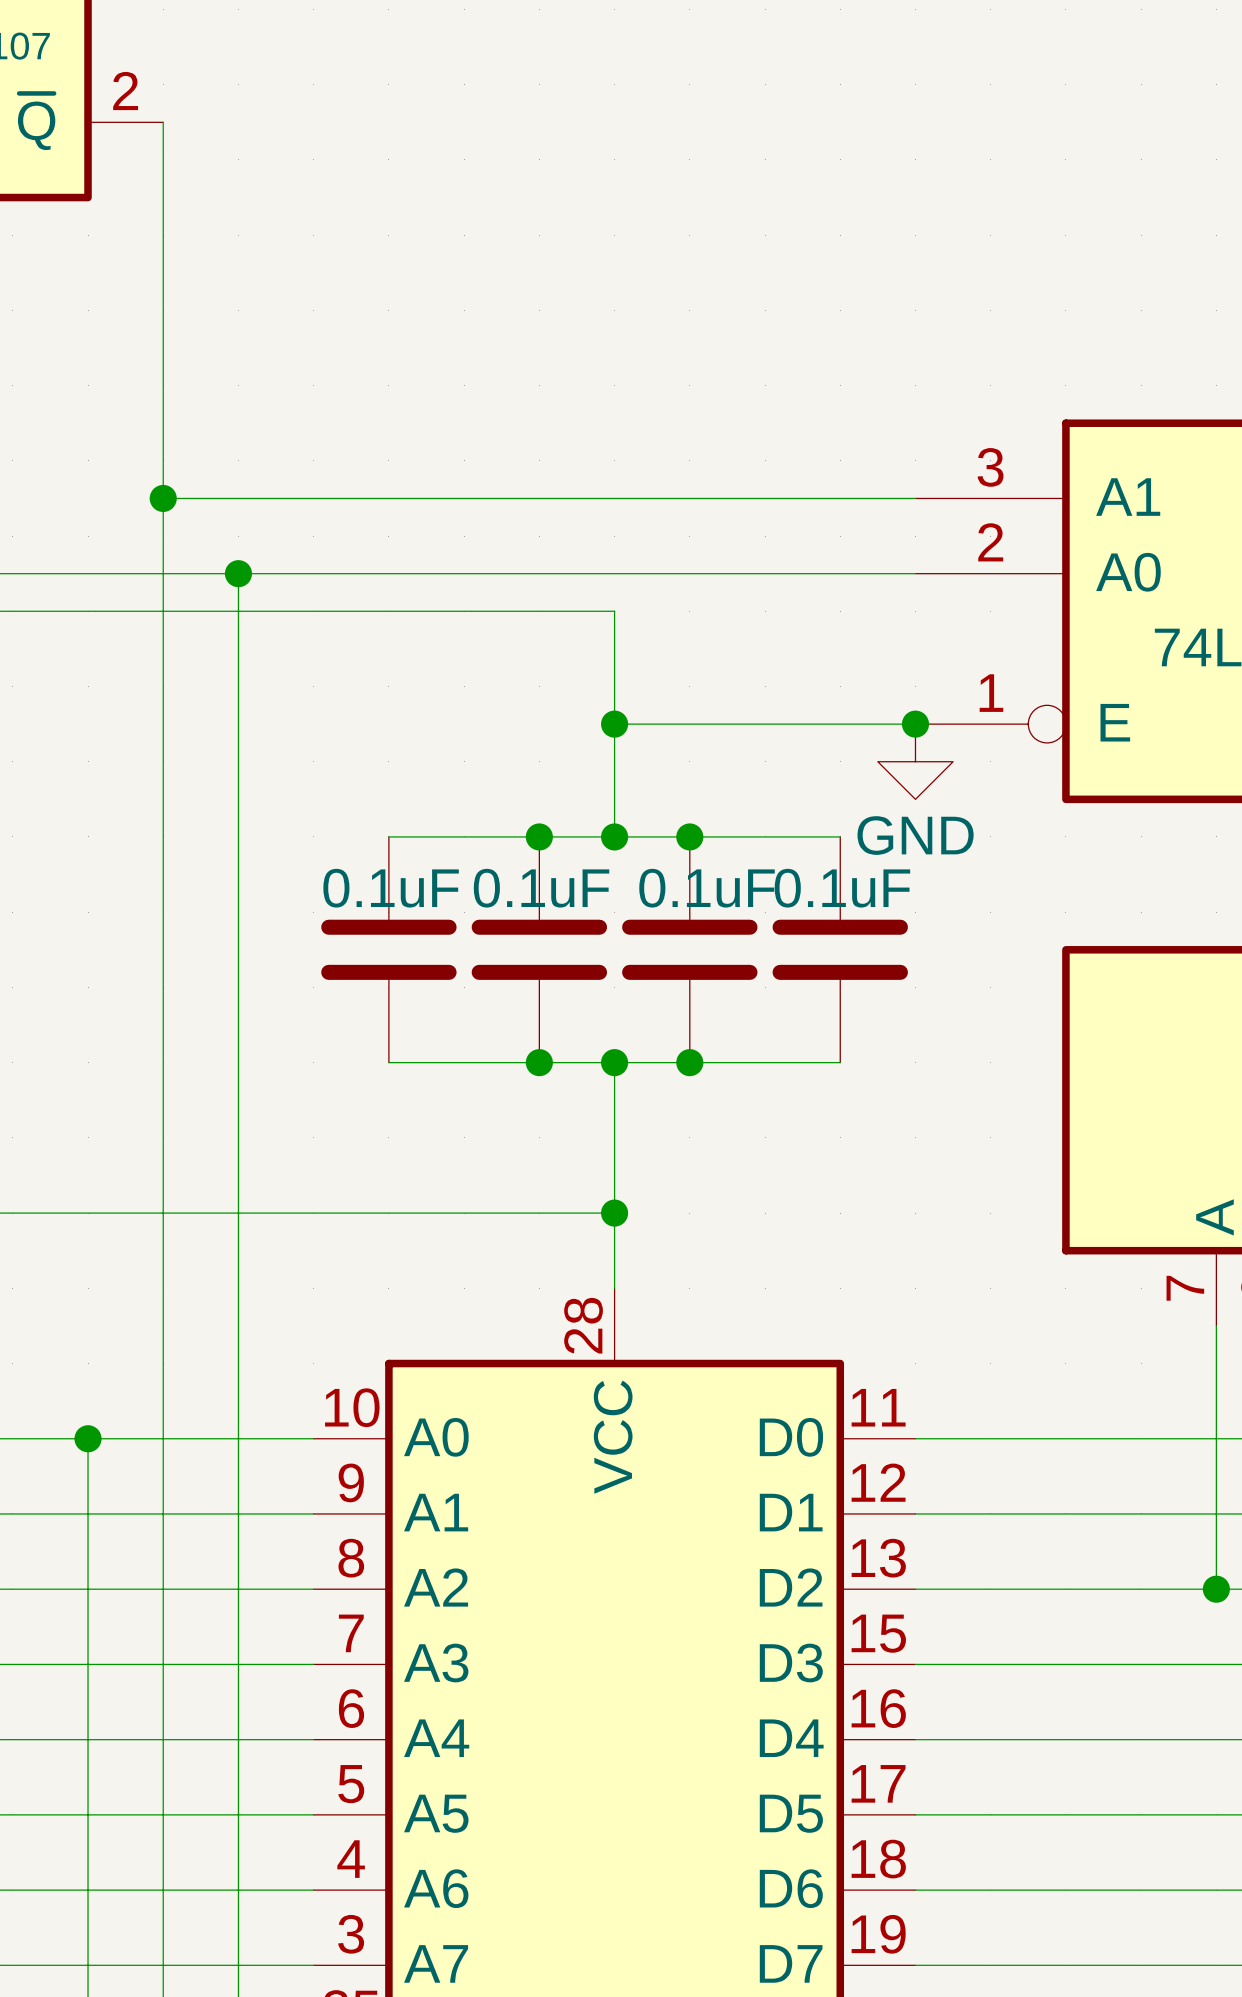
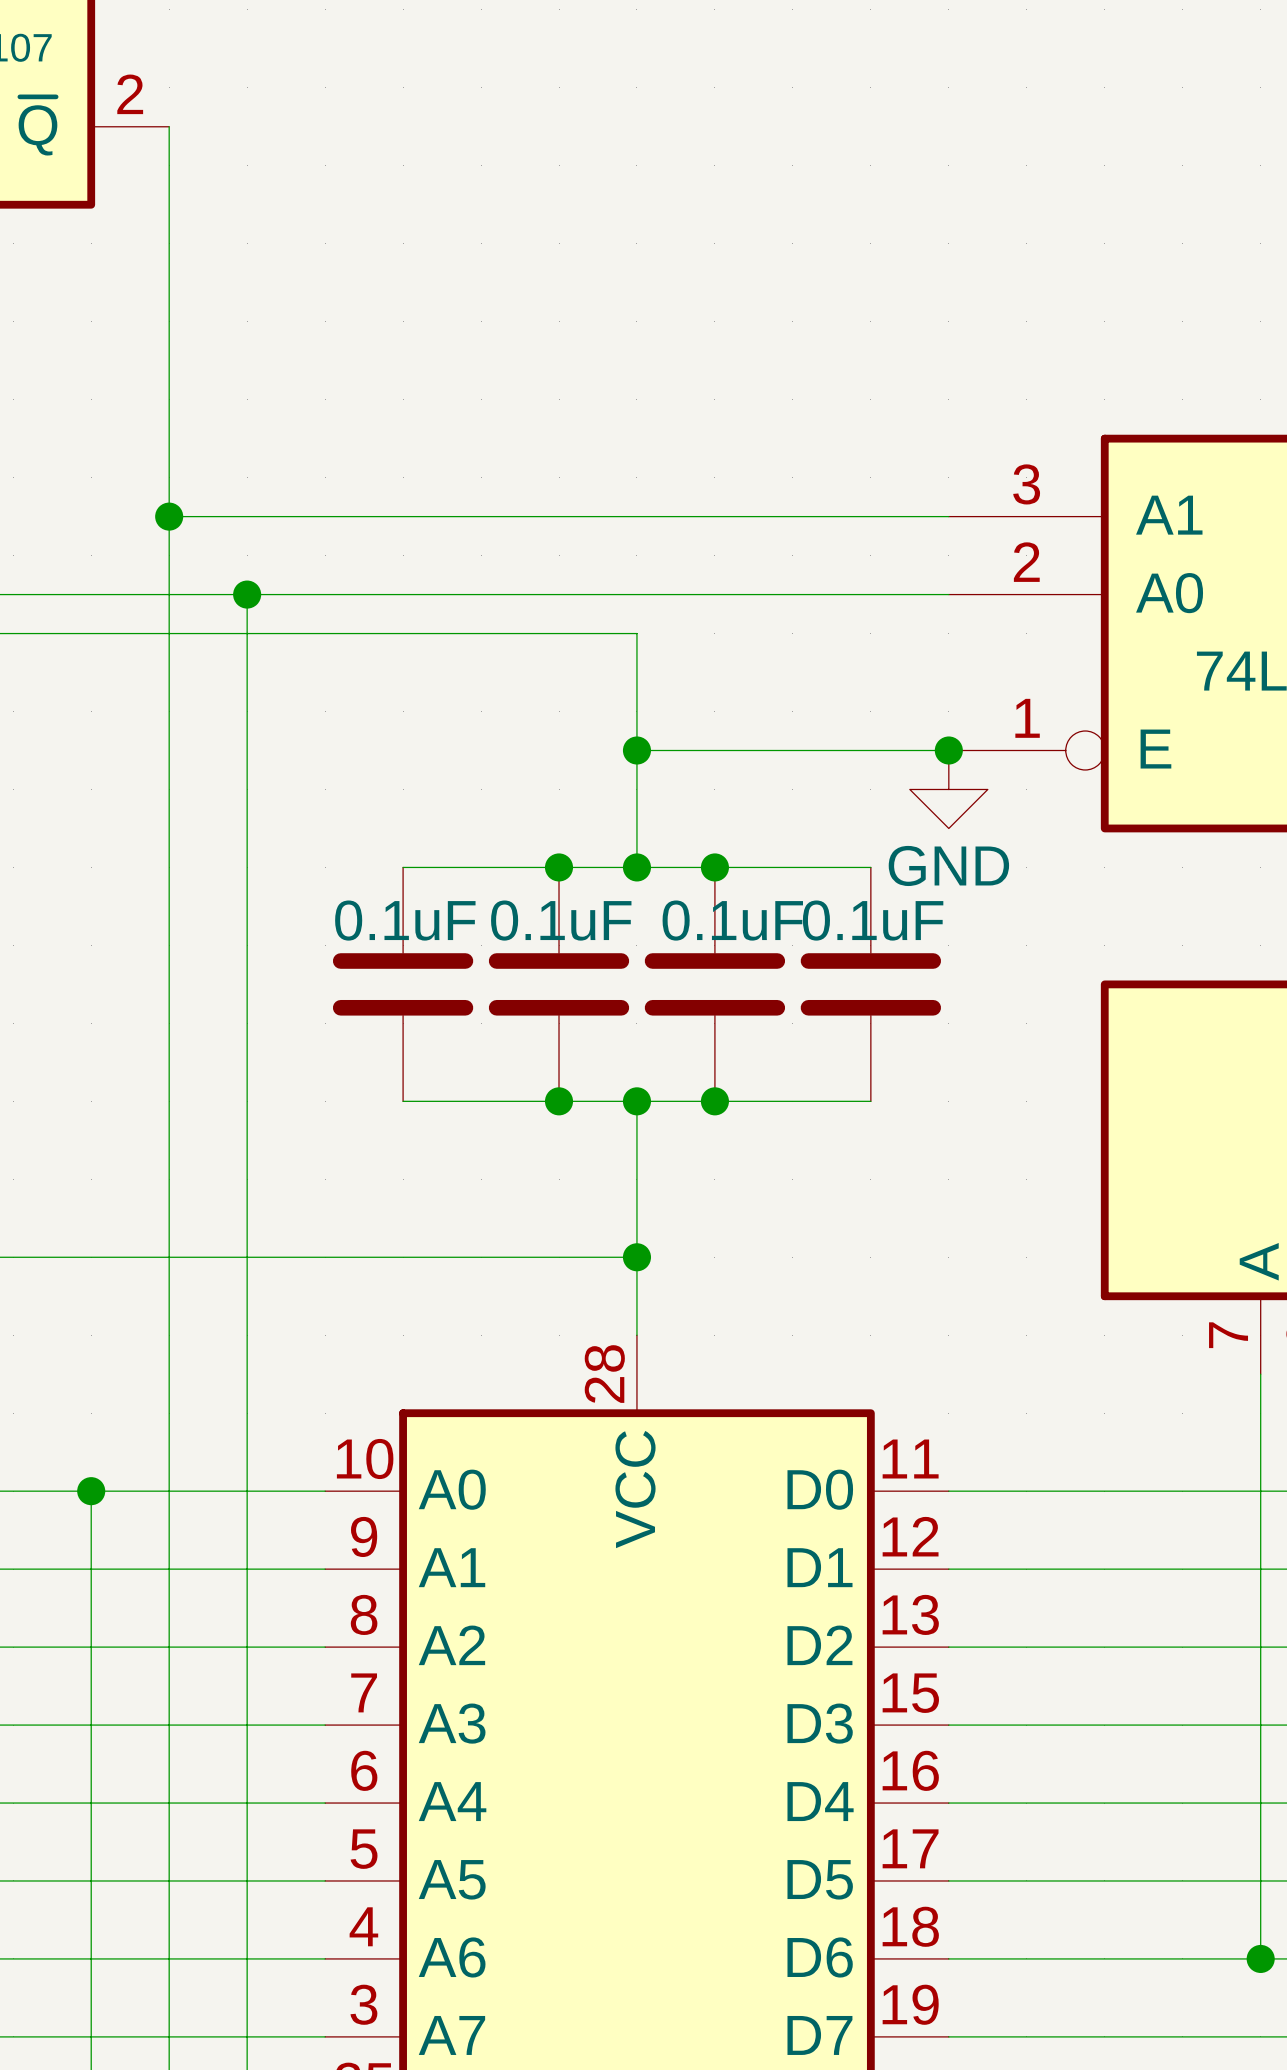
wire: none -> (1260, 1647) (1260, 1958)
junction: (1216, 1589) -> none
junction: none -> (1260, 1958)

